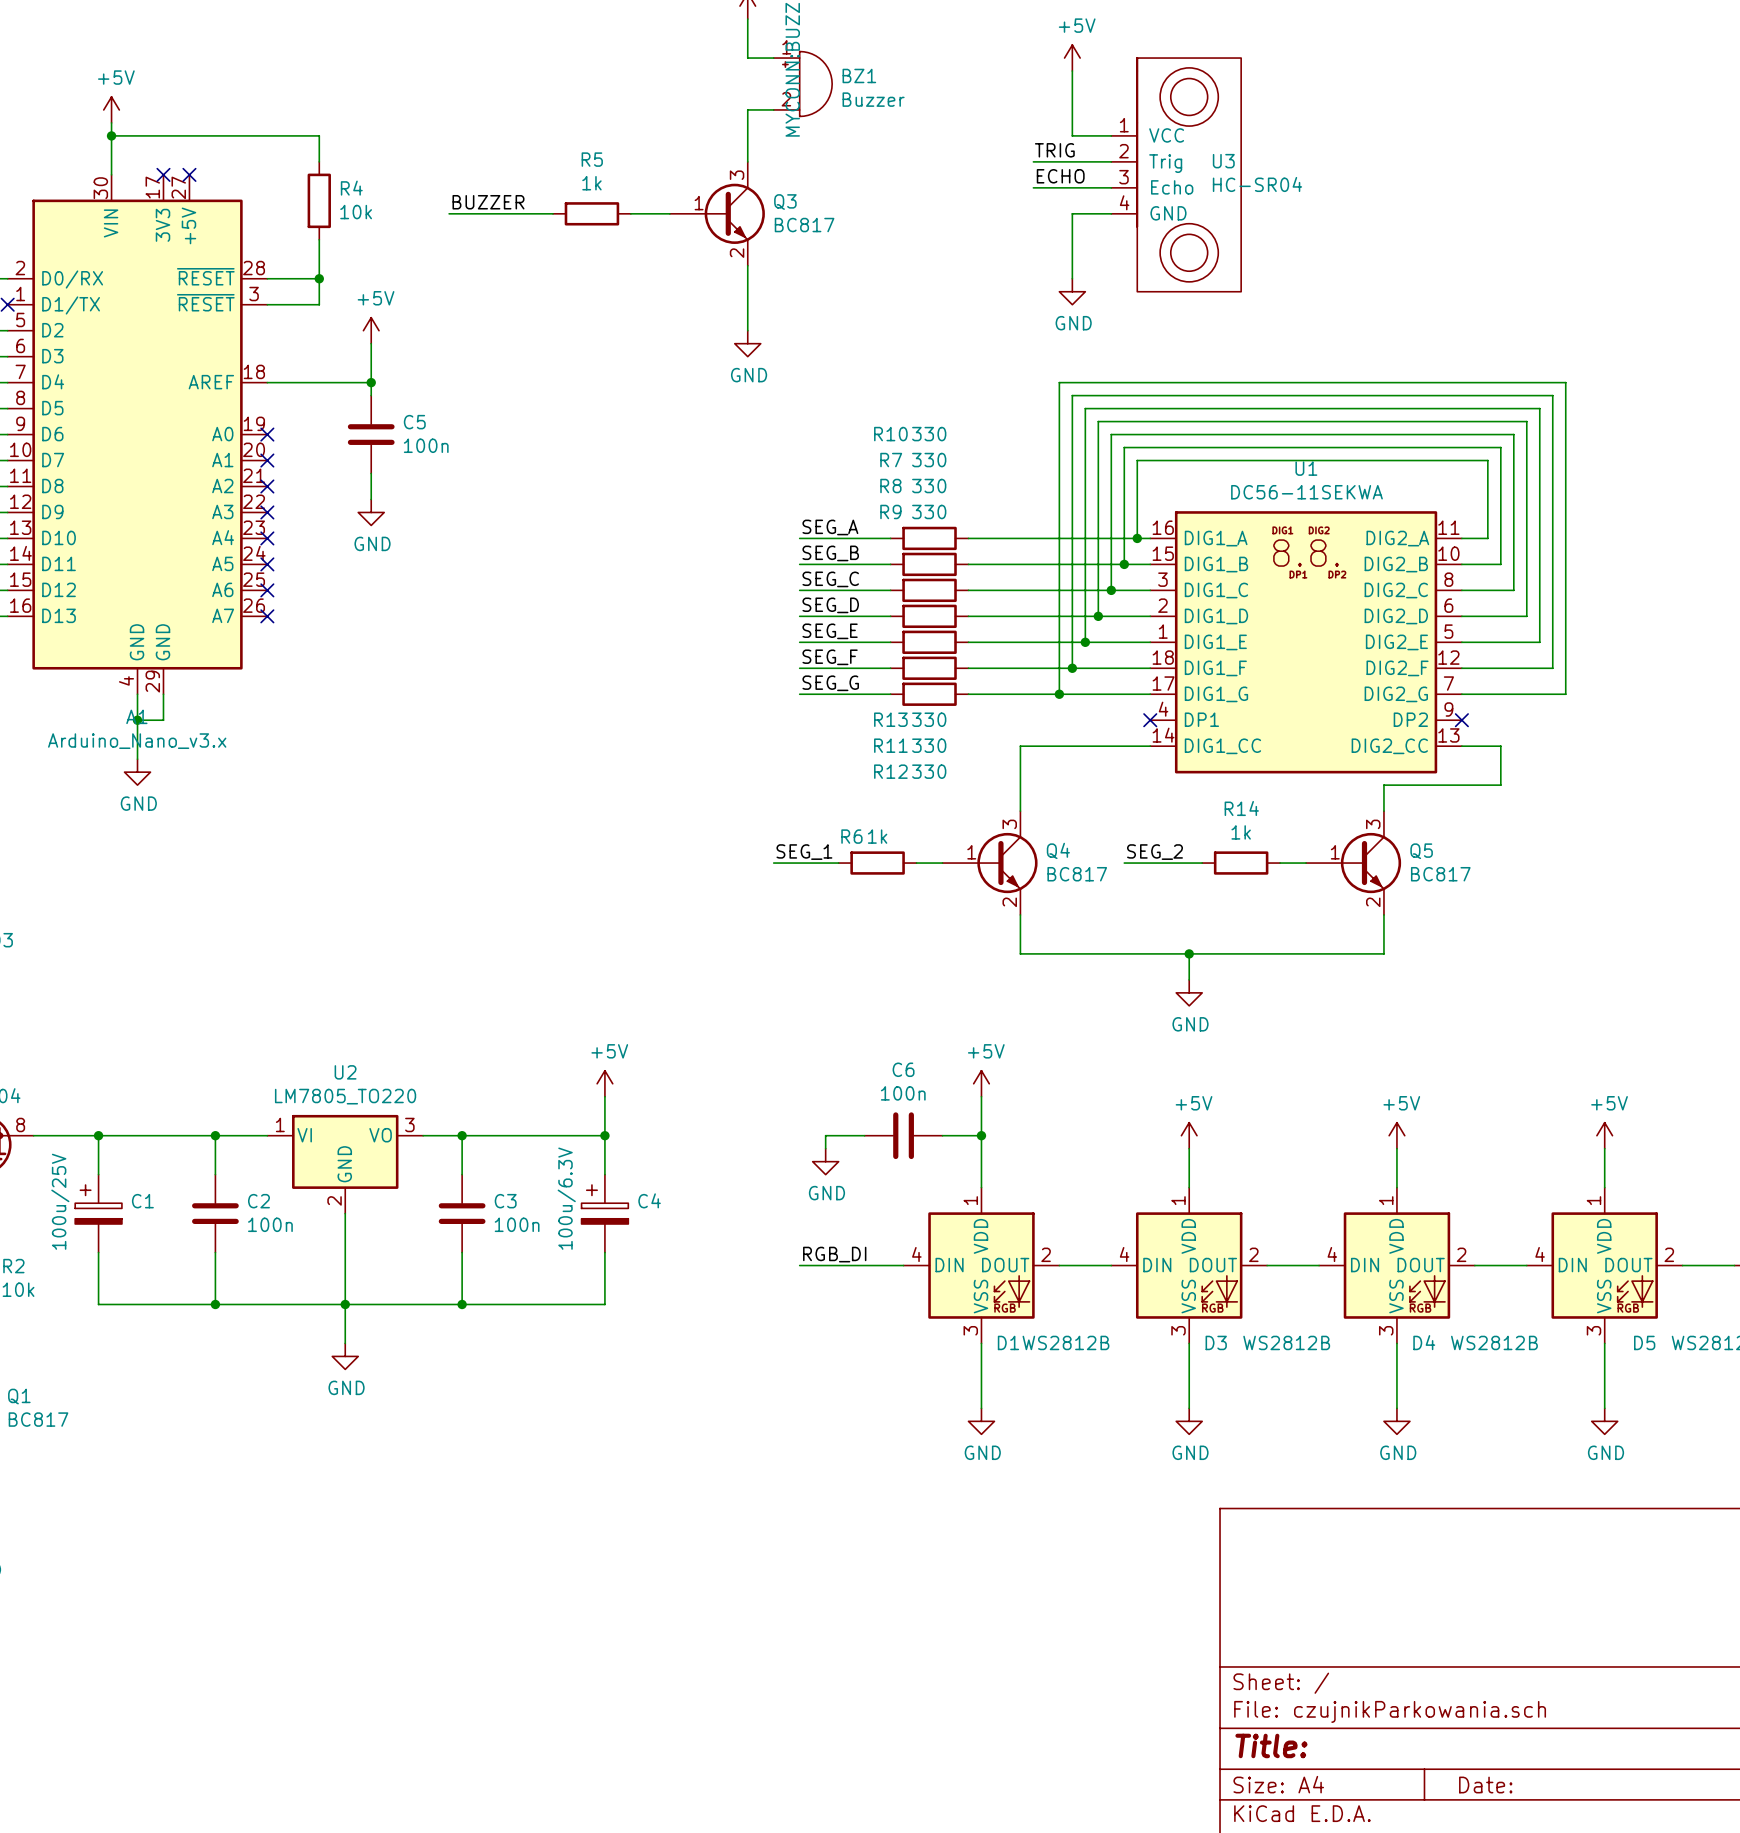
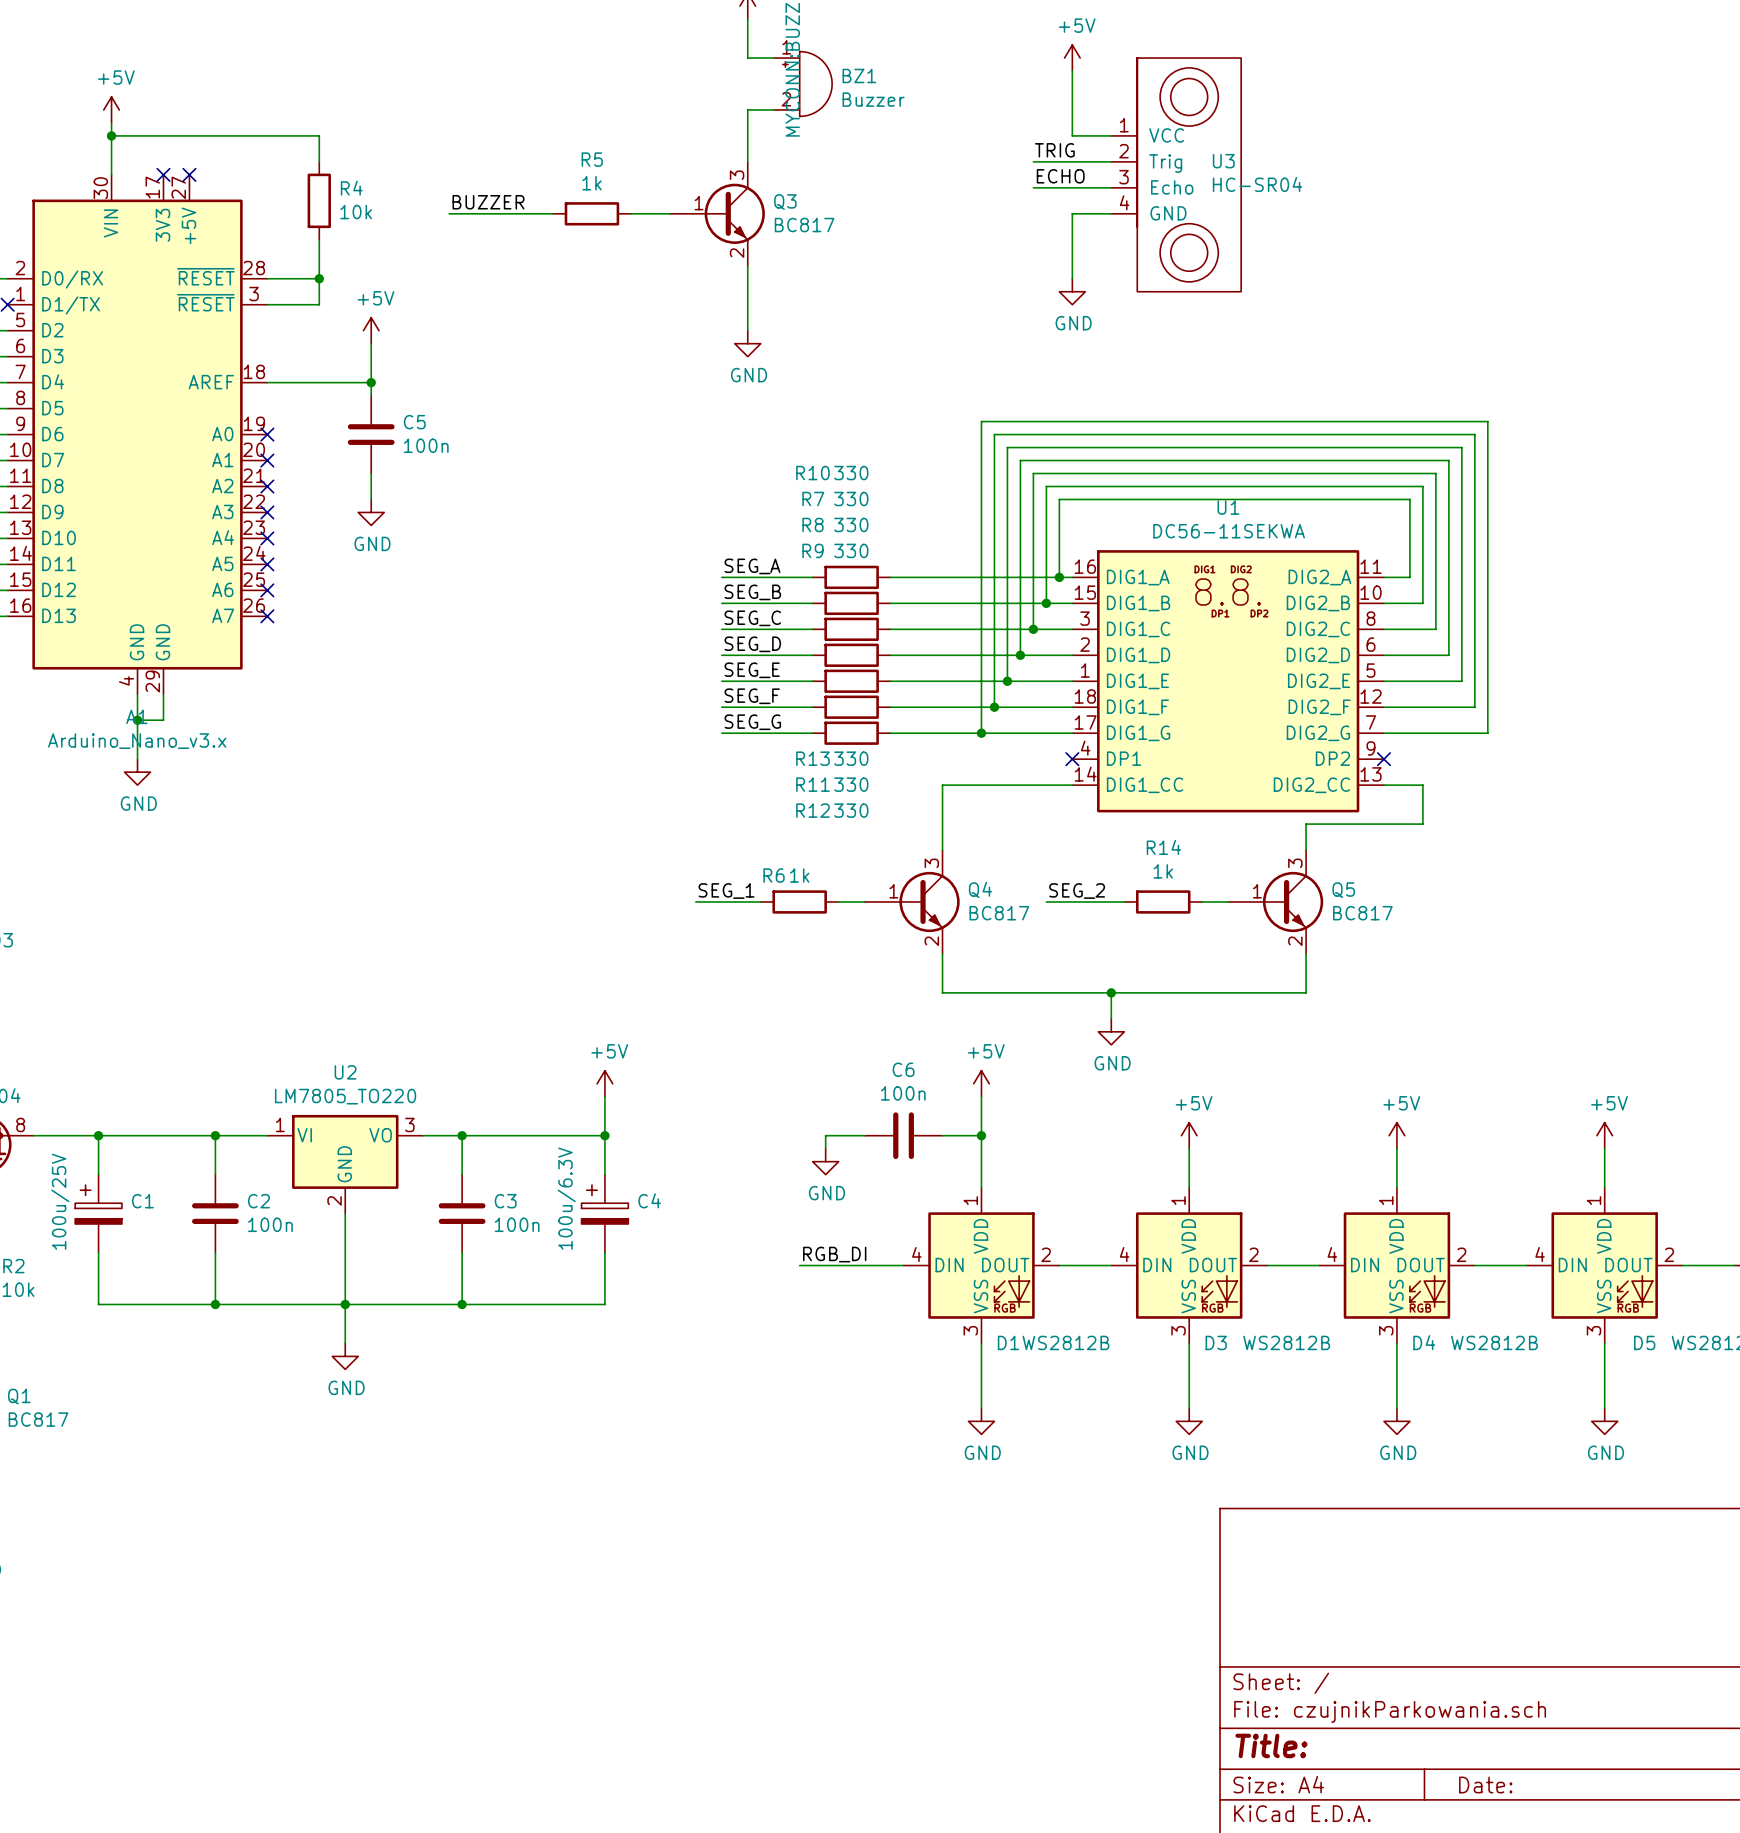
wire: (1098, 421) (1098, 616) -> (1098, 421) (981, 421) (981, 733)
wire: (1487, 421) (1526, 421) (1526, 616) (1461, 616) -> none
wire: (1111, 434) (1111, 590) -> (1111, 434) (994, 434) (994, 707)
wire: (1474, 434) (1513, 434) (1513, 590) (1461, 590) -> (1474, 434) (1474, 707) (1383, 707)
wire: (1124, 447) (1124, 564) -> (1124, 447) (1007, 447) (1007, 681)
wire: (1461, 447) (1500, 447) (1500, 564) (1461, 564) -> (1461, 447) (1461, 681) (1383, 681)
wire: (1137, 460) (1137, 538) -> (1137, 460) (1020, 460) (1020, 655)
wire: (1448, 460) (1487, 460) -> (1487, 421) (1487, 460)
wire: none -> (1448, 460) (1448, 655) (1383, 655)
wire: (1059, 499) (1059, 382) (1565, 382) (1565, 694) (1461, 694) -> (1059, 499) (1409, 499) (1409, 577) (1383, 577)
label position: SEG_A (830, 527) -> SEG_A (752, 566)
wire: (799, 538) (890, 538) -> (721, 577) (812, 577)
R7 position: (929, 538) -> (851, 577)
wire: (968, 538) (1150, 538) -> (890, 577) (1072, 577)
junction: (1137, 538) -> none
wire: (1461, 538) (1487, 538) -> (1383, 733) (1487, 733) (1487, 538)
label position: SEG_B (830, 553) -> SEG_B (752, 592)
wire: (799, 564) (890, 564) -> (721, 603) (812, 603)
R8 position: (929, 564) -> (851, 603)
wire: (968, 564) (1150, 564) -> (890, 603) (1072, 603)
junction: (1124, 564) -> none
wire: (1059, 577) (1059, 694) -> none
junction: none -> (1059, 577)
label position: SEG_C (830, 579) -> SEG_C (752, 618)
wire: (799, 590) (890, 590) -> (721, 629) (812, 629)
R9 position: (929, 590) -> (851, 629)
wire: (968, 590) (1150, 590) -> (890, 629) (1072, 629)
junction: (1111, 590) -> none
wire: none -> (1046, 603) (1046, 486) (1422, 486) (1422, 603) (1383, 603)
junction: none -> (1046, 603)
label position: SEG_D (830, 605) -> SEG_D (752, 644)
wire: (799, 616) (890, 616) -> (721, 655) (812, 655)
R10 position: (929, 616) -> (851, 655)
wire: (968, 616) (1150, 616) -> (890, 655) (1072, 655)
junction: (1098, 616) -> none
wire: none -> (1033, 629) (1033, 473) (1435, 473) (1435, 629) (1383, 629)
junction: none -> (1033, 629)
label position: SEG_E (830, 631) -> SEG_E (752, 670)
wire: (799, 642) (890, 642) -> (721, 681) (812, 681)
R11 position: (929, 642) -> (851, 681)
wire: (968, 642) (1150, 642) -> (890, 681) (1072, 681)
wire: (1085, 642) (1085, 408) (1539, 408) (1539, 642) (1461, 642) -> none
junction: (1085, 642) -> none
U1 position: (1306, 642) -> (1228, 681)
junction: none -> (1020, 655)
label position: SEG_F (830, 657) -> SEG_F (752, 696)
wire: (799, 668) (890, 668) -> (721, 707) (812, 707)
R12 position: (929, 668) -> (851, 707)
wire: (968, 668) (1150, 668) -> (890, 707) (1072, 707)
wire: (1072, 668) (1072, 395) (1552, 395) (1552, 668) (1461, 668) -> none
junction: (1072, 668) -> none
junction: none -> (1007, 681)
label position: SEG_G (830, 683) -> SEG_G (752, 722)
wire: (799, 694) (890, 694) -> (721, 733) (812, 733)
R13 position: (929, 694) -> (851, 733)
wire: (968, 694) (1150, 694) -> (890, 733) (1072, 733)
junction: (1059, 694) -> none
junction: none -> (994, 707)
no-connect mark: (1150, 720) -> none
no-connect mark: (1461, 720) -> none
junction: none -> (981, 733)
wire: (1150, 746) (1020, 746) (1020, 811) -> (1072, 785) (942, 785) (942, 850)
wire: (1461, 746) (1500, 746) (1500, 785) (1422, 785) -> (1306, 850) (1306, 824) (1422, 824) (1422, 785)
no-connect mark: none -> (1072, 759)
no-connect mark: none -> (1383, 759)
wire: (1383, 785) (1383, 811) -> none
label position: SEG_1 (804, 852) -> SEG_1 (726, 891)
label position: SEG_2 (1154, 852) -> SEG_2 (1077, 891)
wire: (773, 863) (838, 863) -> (695, 901) (760, 901)
R6 position: (877, 863) -> (799, 901)
wire: (916, 863) (942, 863) -> (838, 901) (864, 901)
Q4 position: (990, 863) -> (912, 901)
wire: (1124, 863) (1202, 863) -> (1046, 901) (1124, 901)
R14 position: (1241, 863) -> (1163, 901)
wire: (1280, 863) (1306, 863) -> (1202, 901) (1228, 901)
Q5 position: (1353, 863) -> (1275, 901)
wire: (1020, 914) (1020, 953) (1383, 953) (1383, 914) -> (942, 953) (942, 992) (1306, 992) (1306, 953)
wire: (1189, 953) (1189, 979) -> (1111, 992) (1111, 1018)
junction: (1189, 953) -> none
junction: none -> (1111, 992)
power symbol position: GND (1189, 992) -> GND (1111, 1031)

